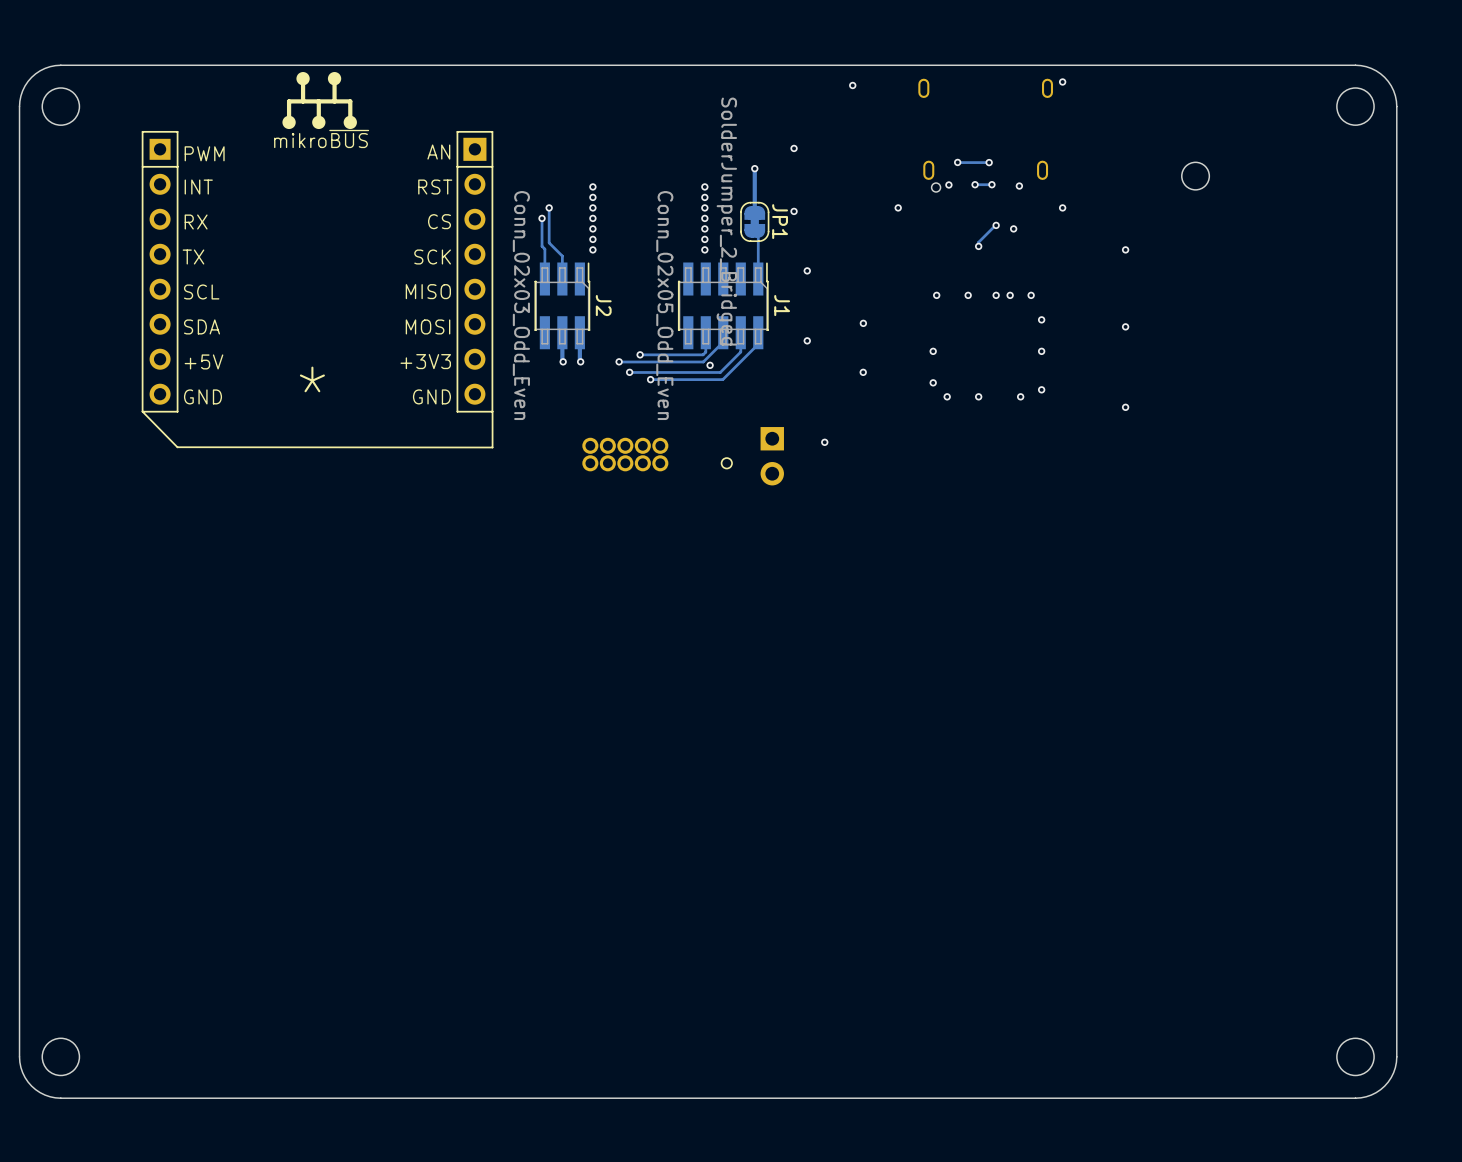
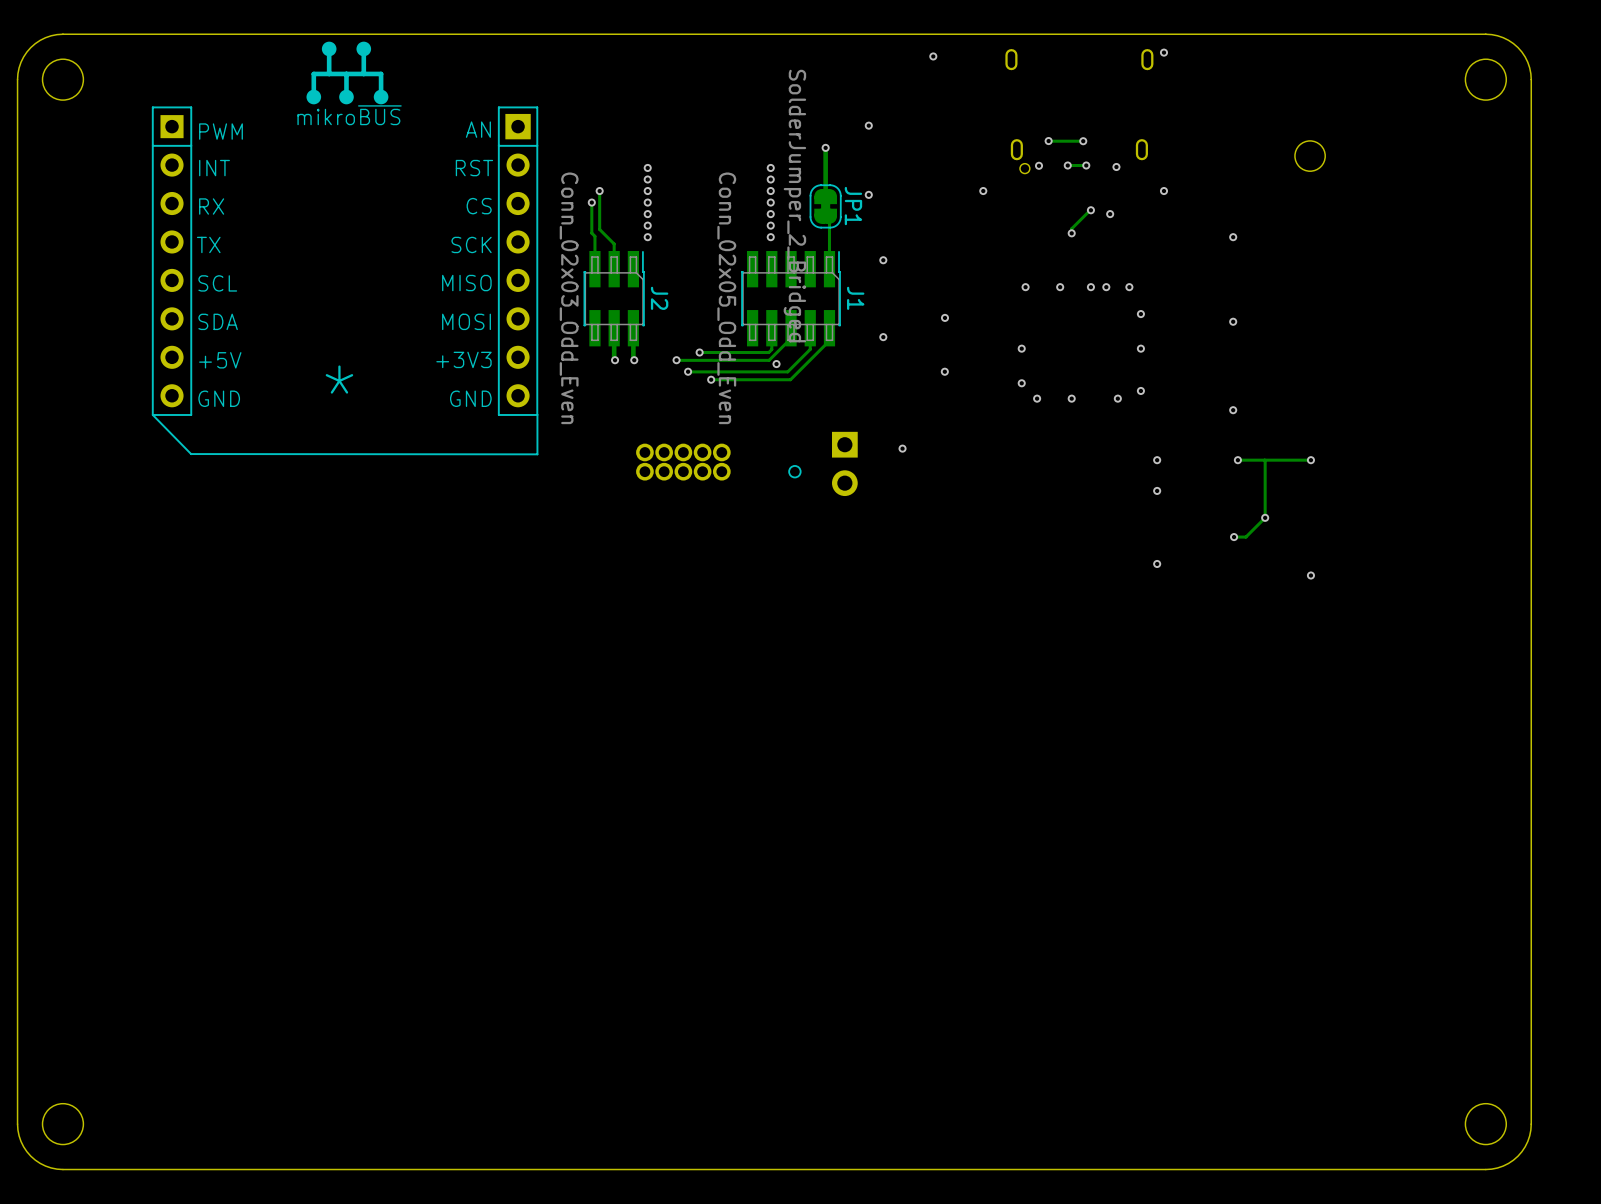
via: none -> (1157, 460)
via: none -> (1237, 460)
track: none -> (1264, 460) (1265, 517) (1245, 537) (1234, 537)
track: none -> (1310, 460) (1237, 460)
via: none -> (1310, 460)
via: none -> (1157, 490)
via: none -> (1265, 517)
via: none -> (1234, 537)
via: none -> (1157, 563)
via: none -> (1310, 575)

